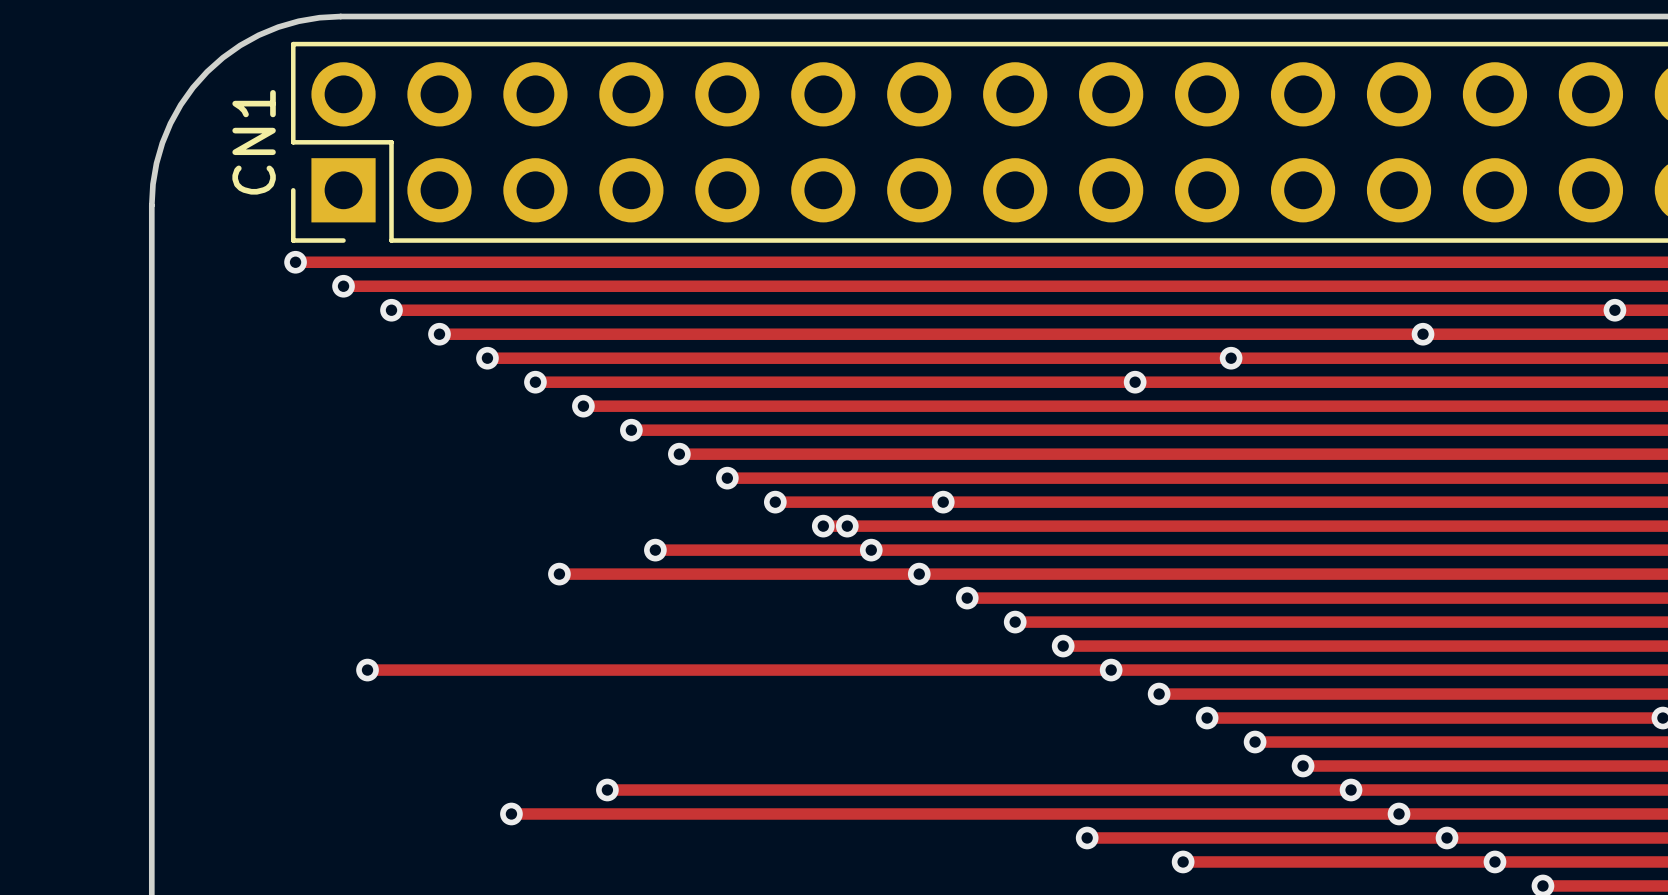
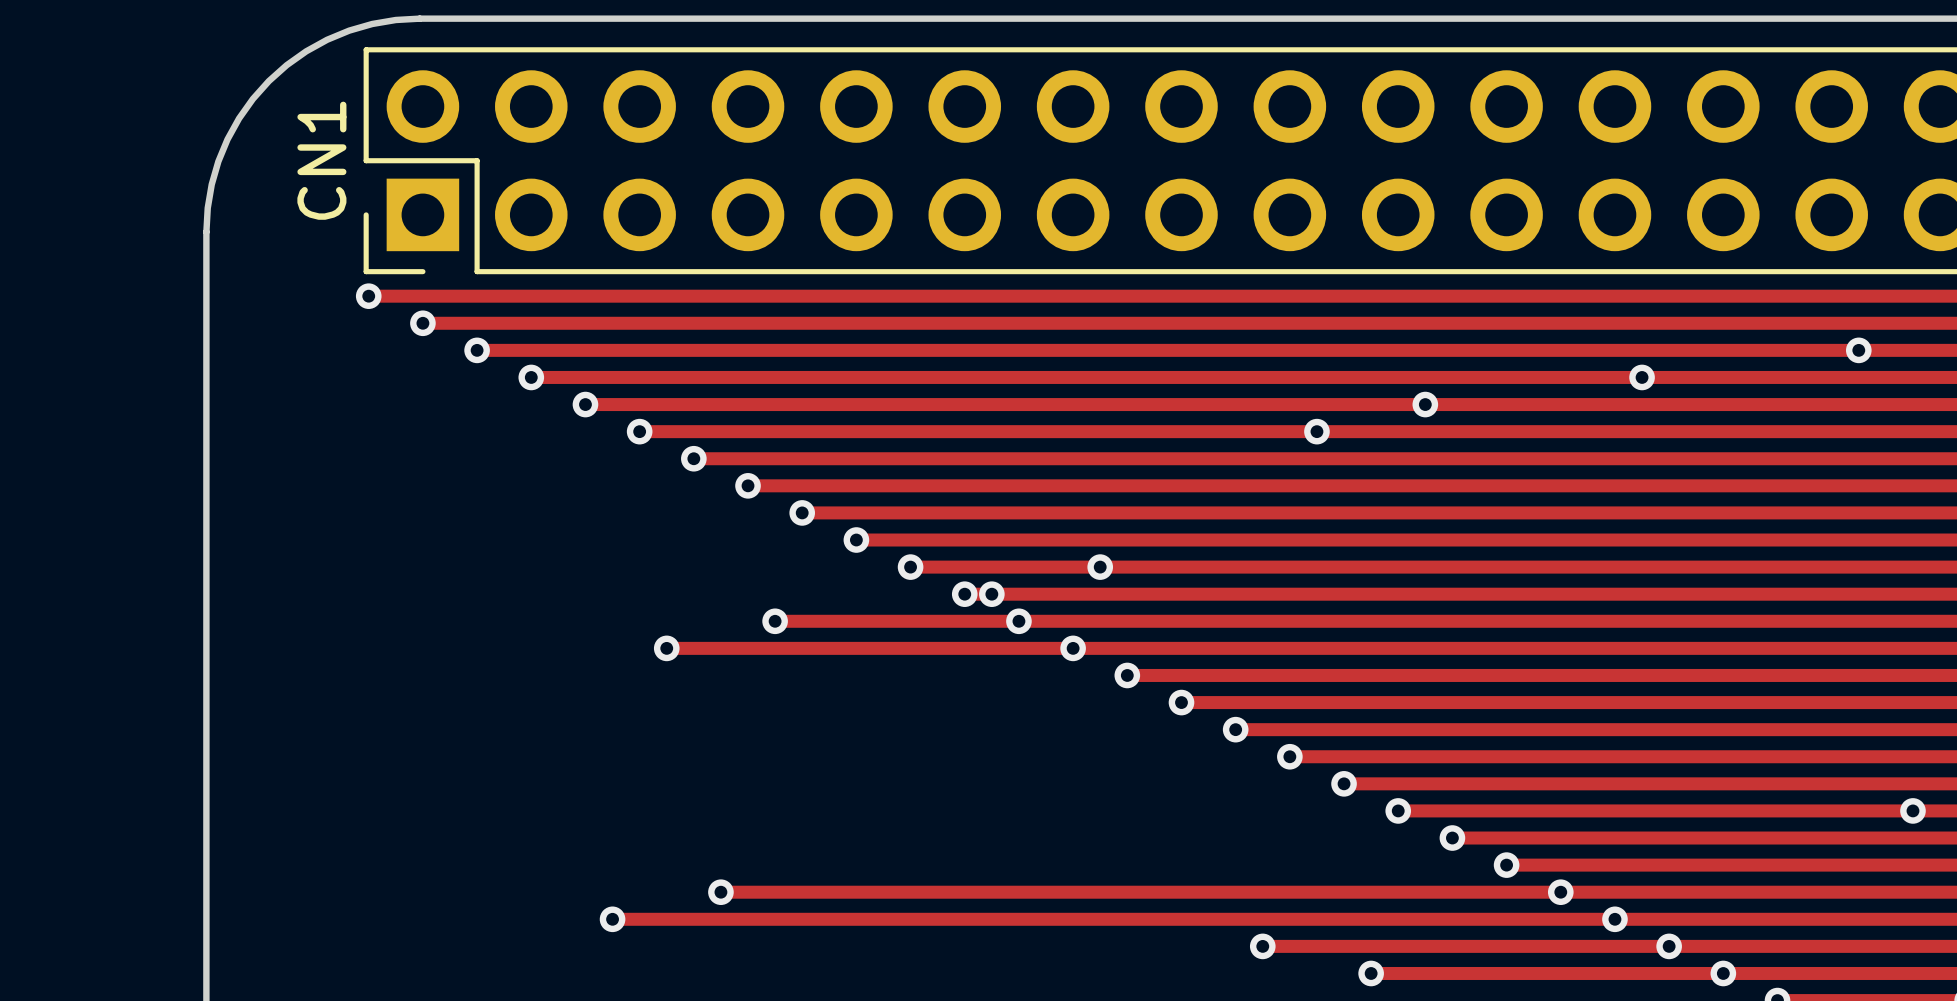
track: (367, 670) (1111, 670) -> none
via: (367, 670) -> none

